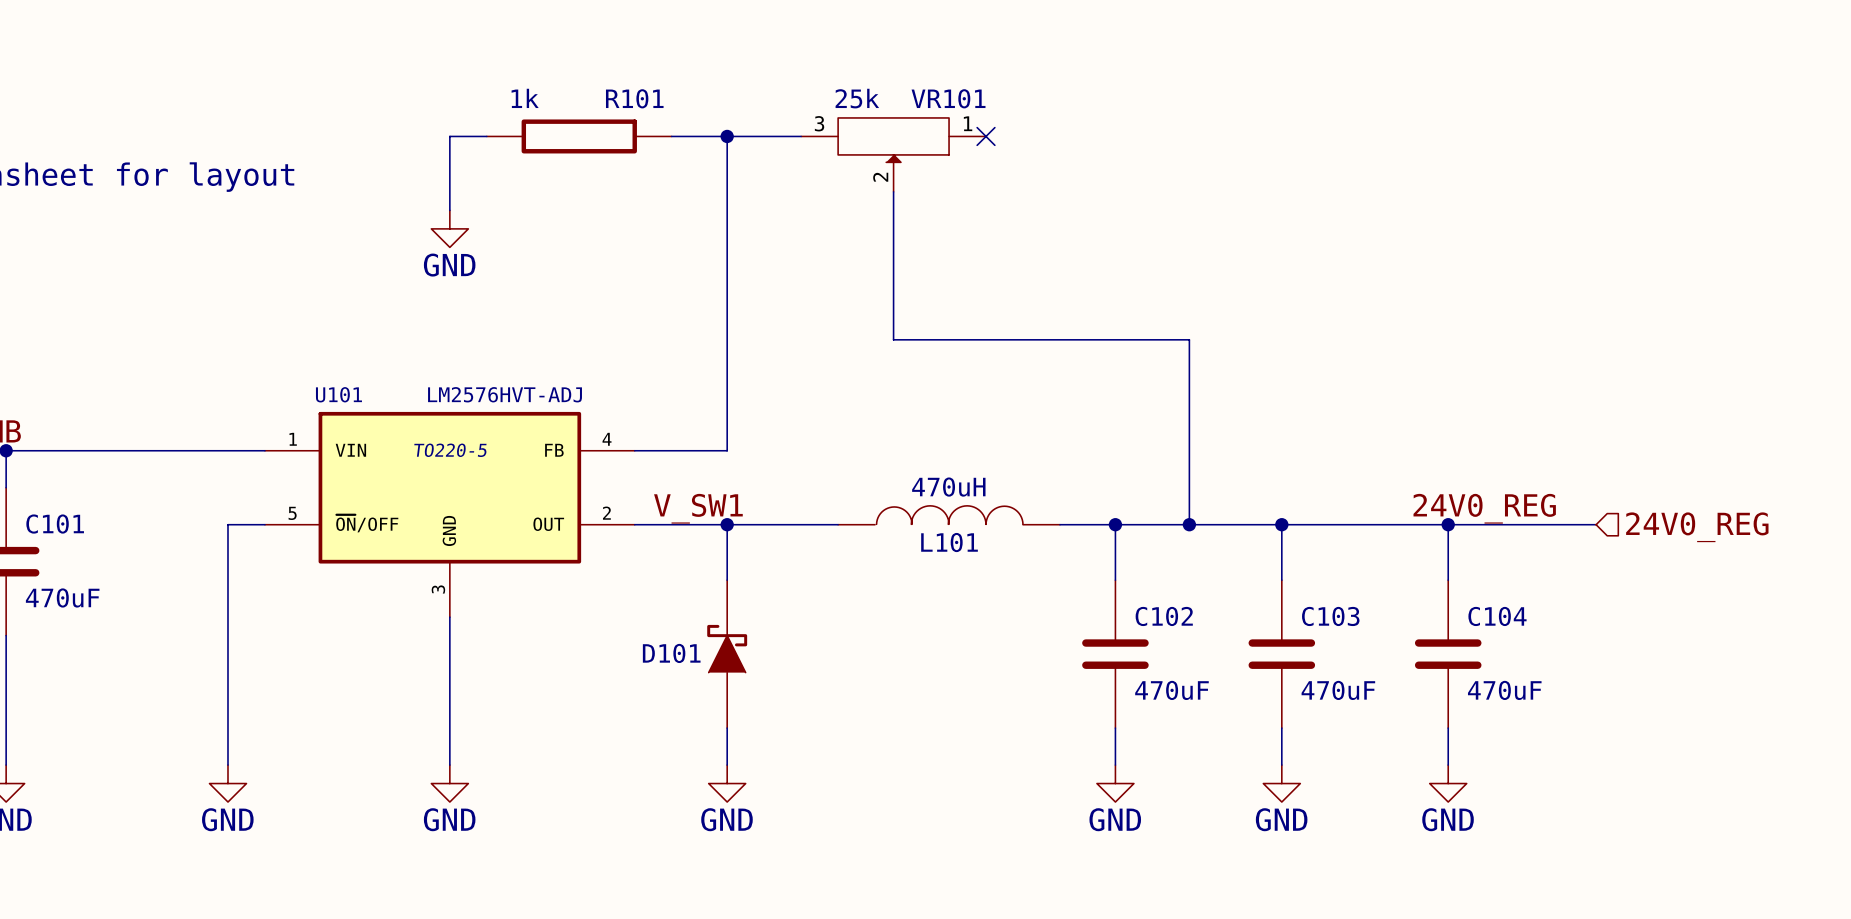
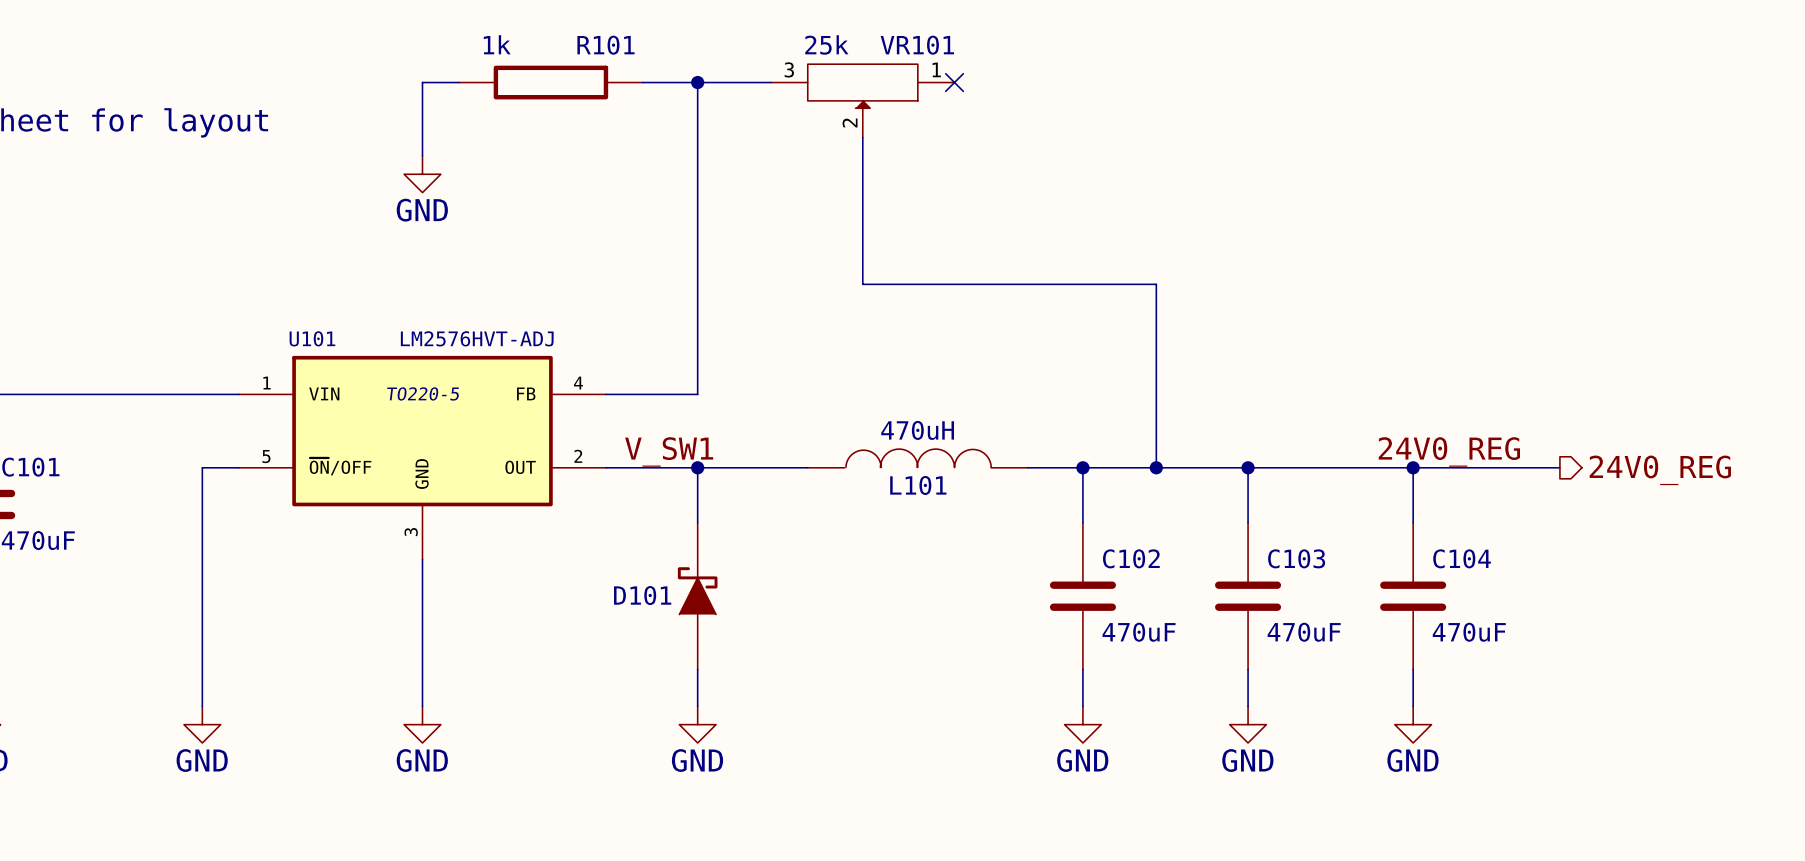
hierarchical label shape: input (1697, 527) -> output (1660, 470)

